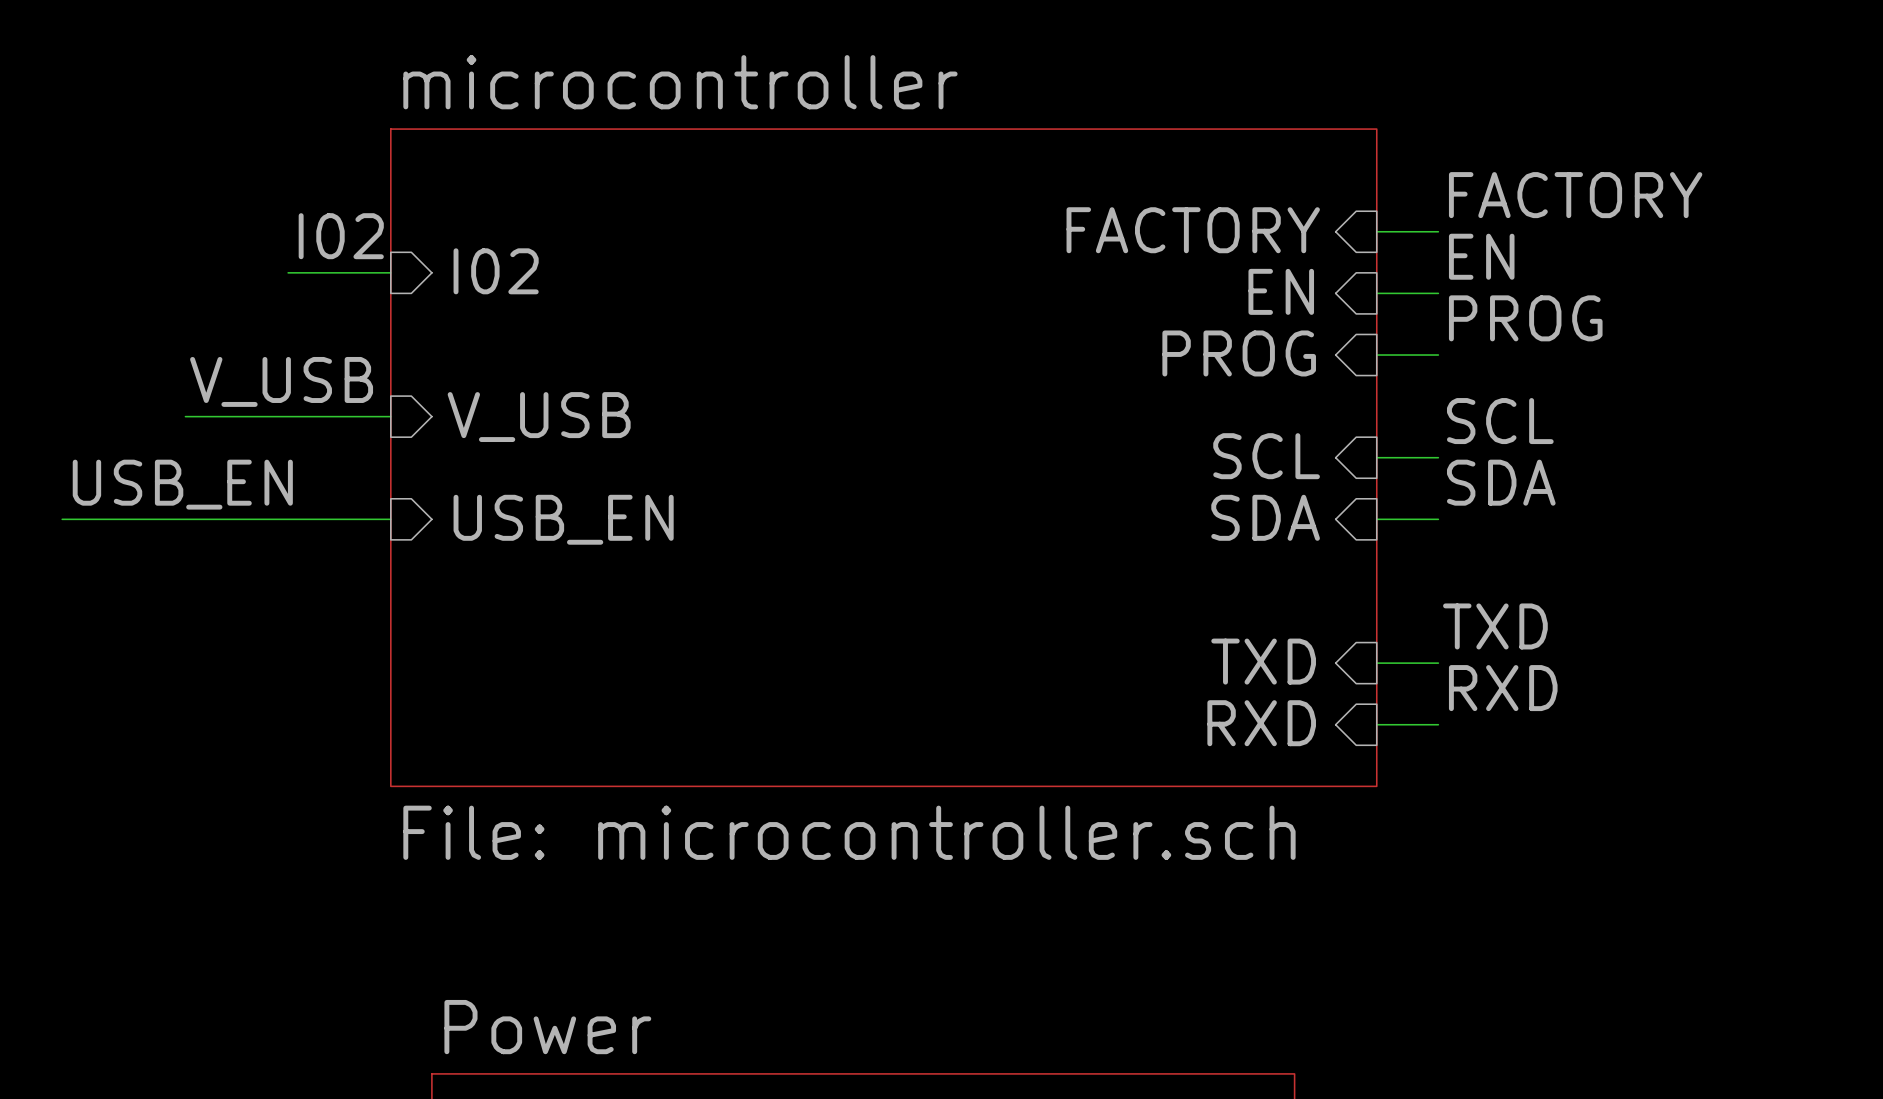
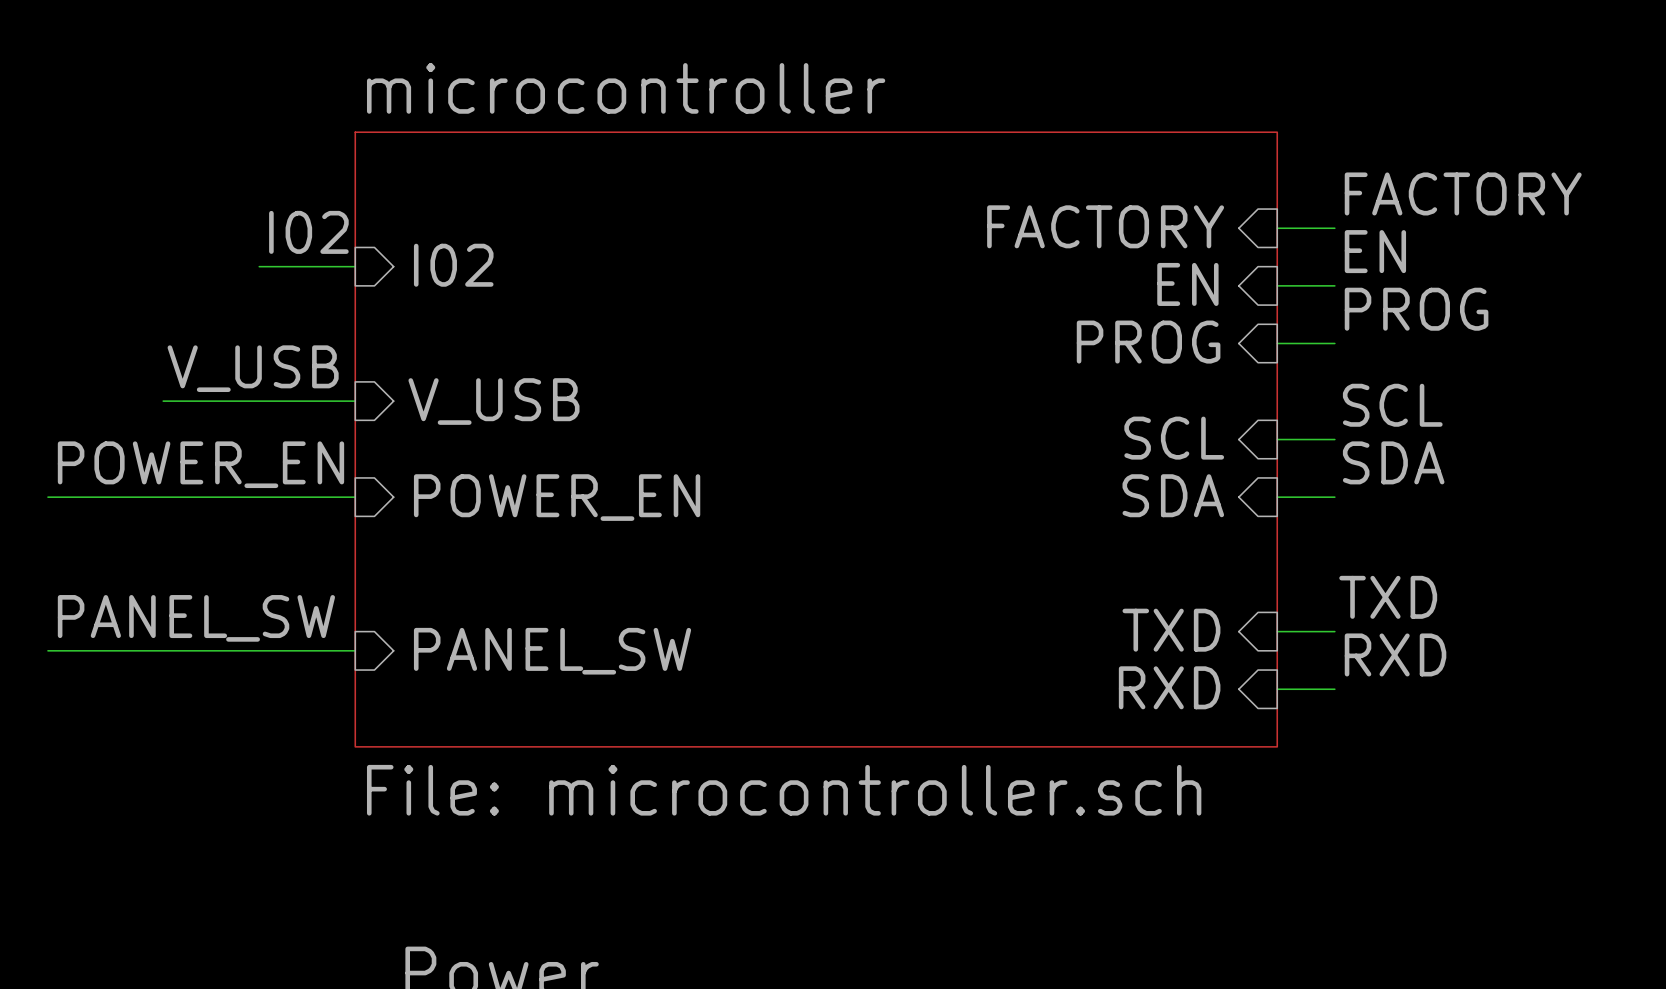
label: USB_EN (182, 484) -> POWER_EN (200, 464)
sheet pin: USB_EN (563, 519) -> POWER_EN (557, 497)
label: none -> PANEL_SW (196, 618)
wire: none -> (47, 650) (355, 650)
sheet pin: none -> PANEL_SW (552, 651)

